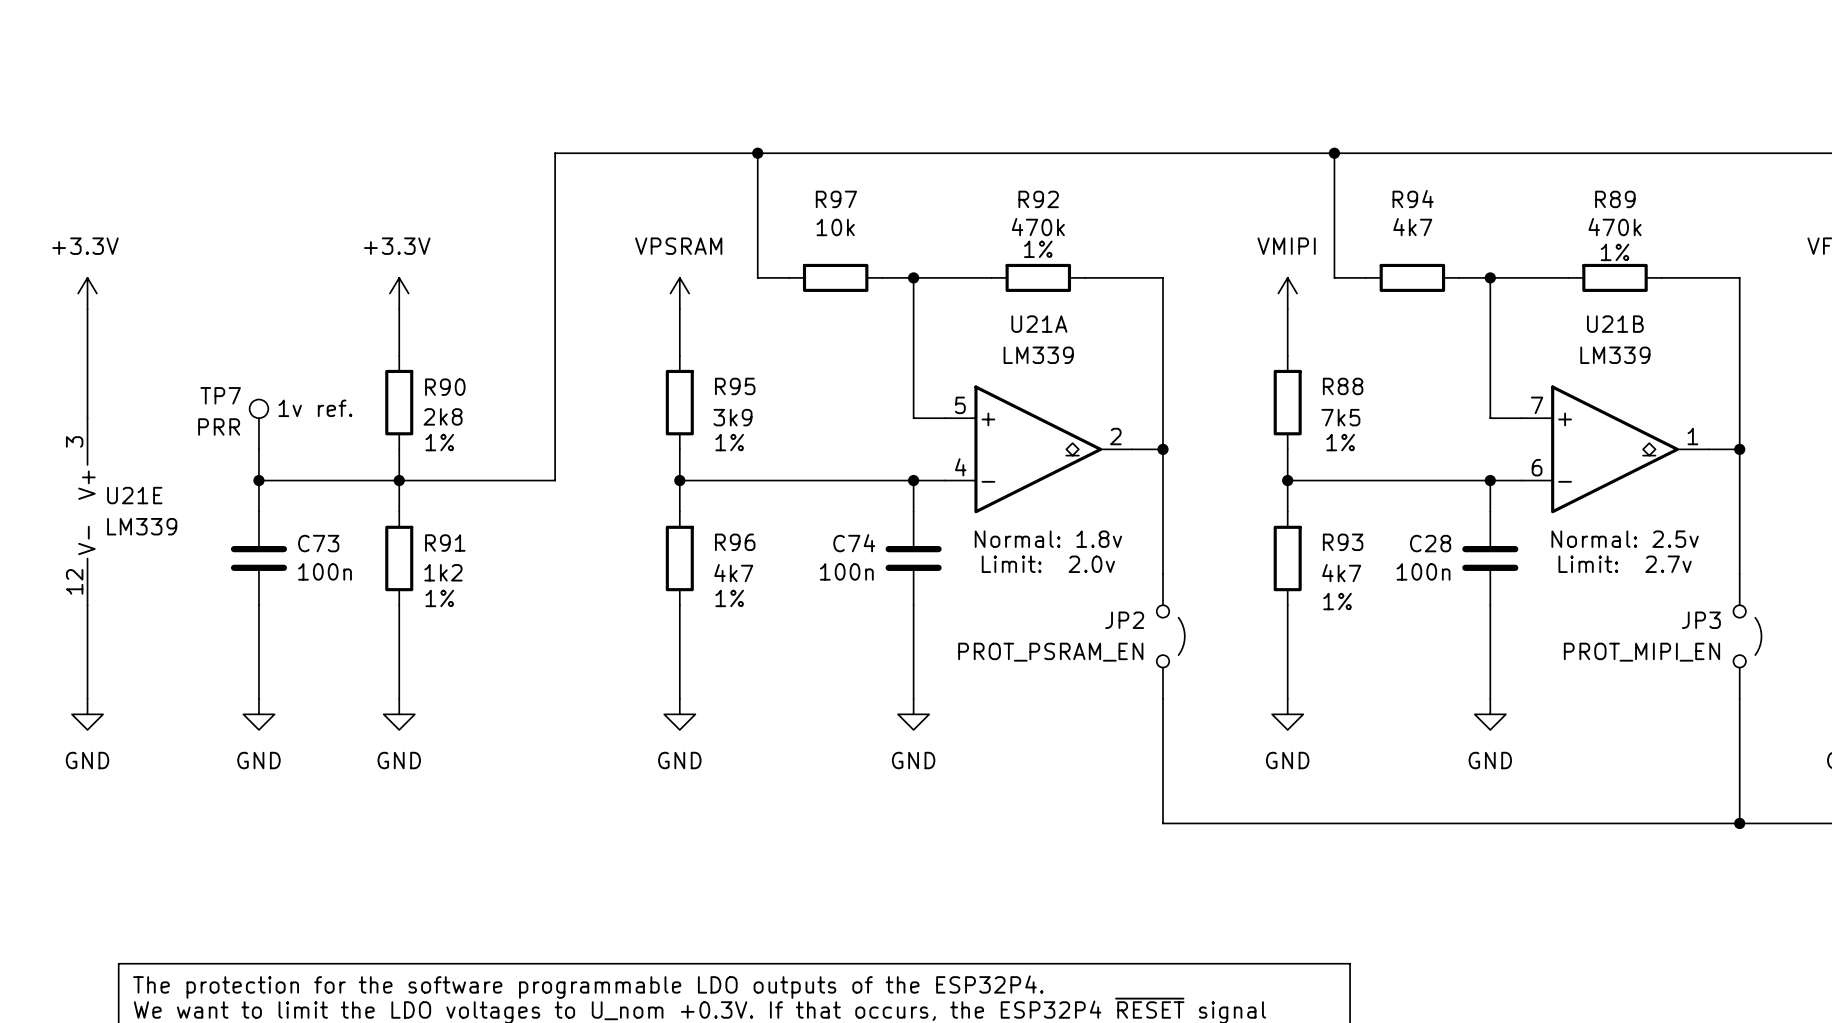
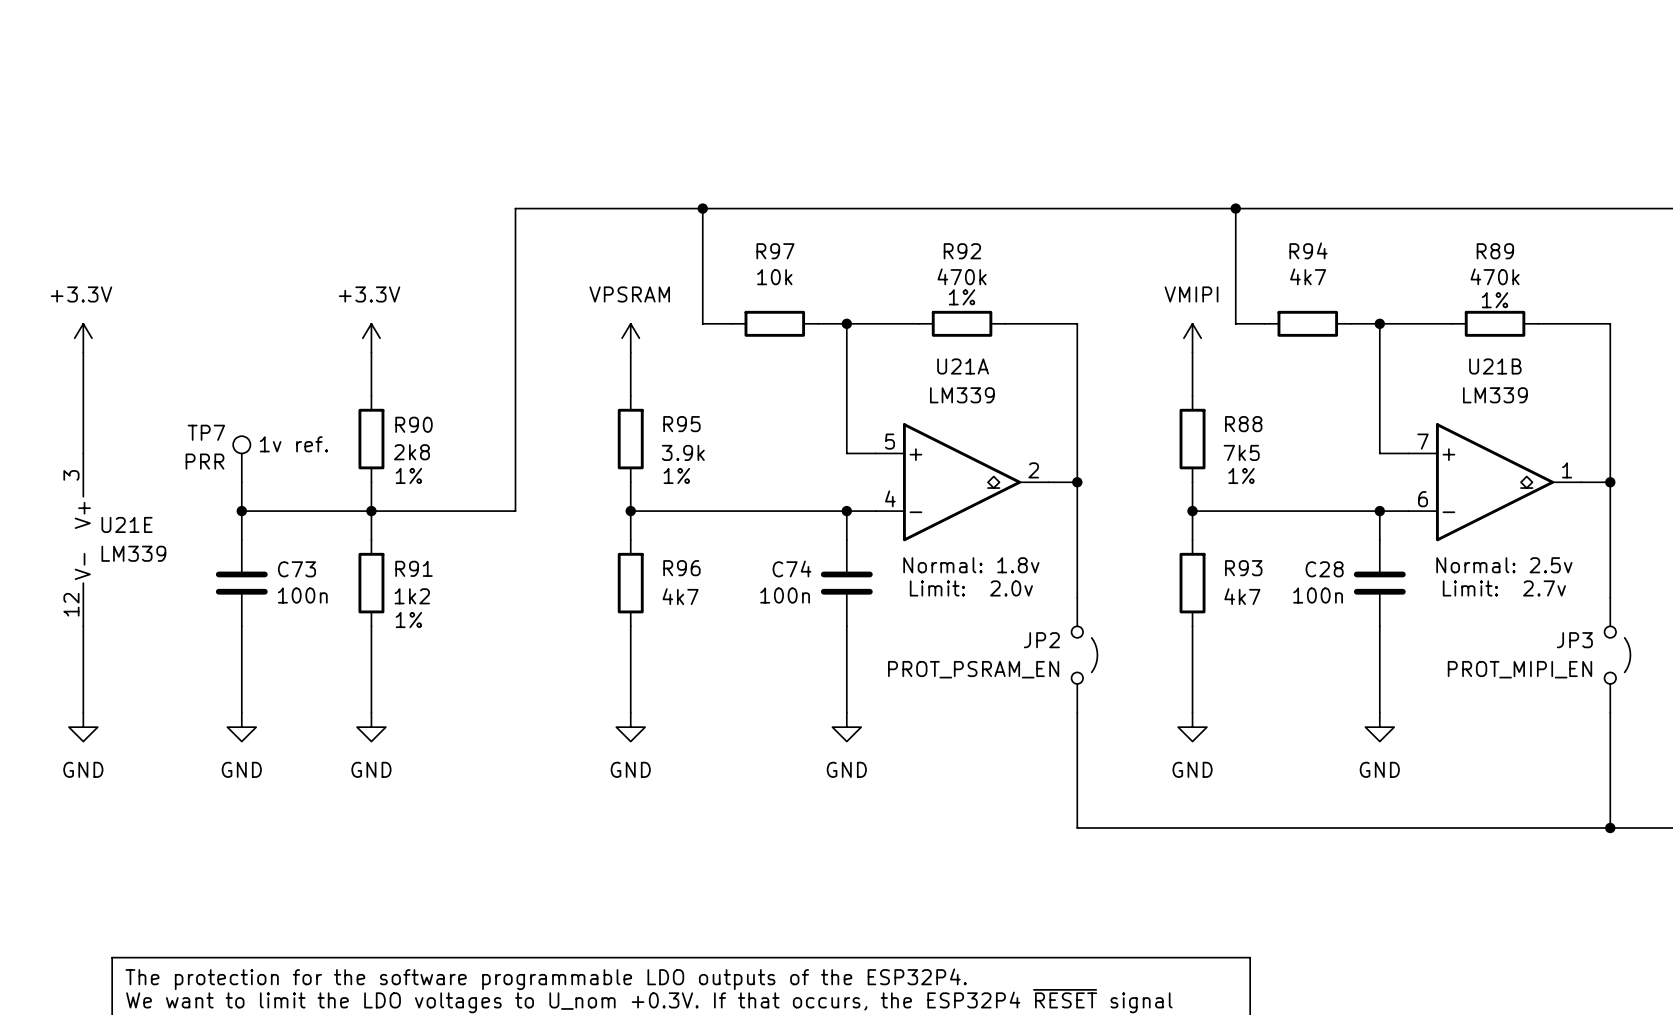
R95 value: 3k9 (732, 417) -> 3.9k (683, 452)
R96 text: 1% (729, 598) -> none
R93 text: 1% (1337, 601) -> none

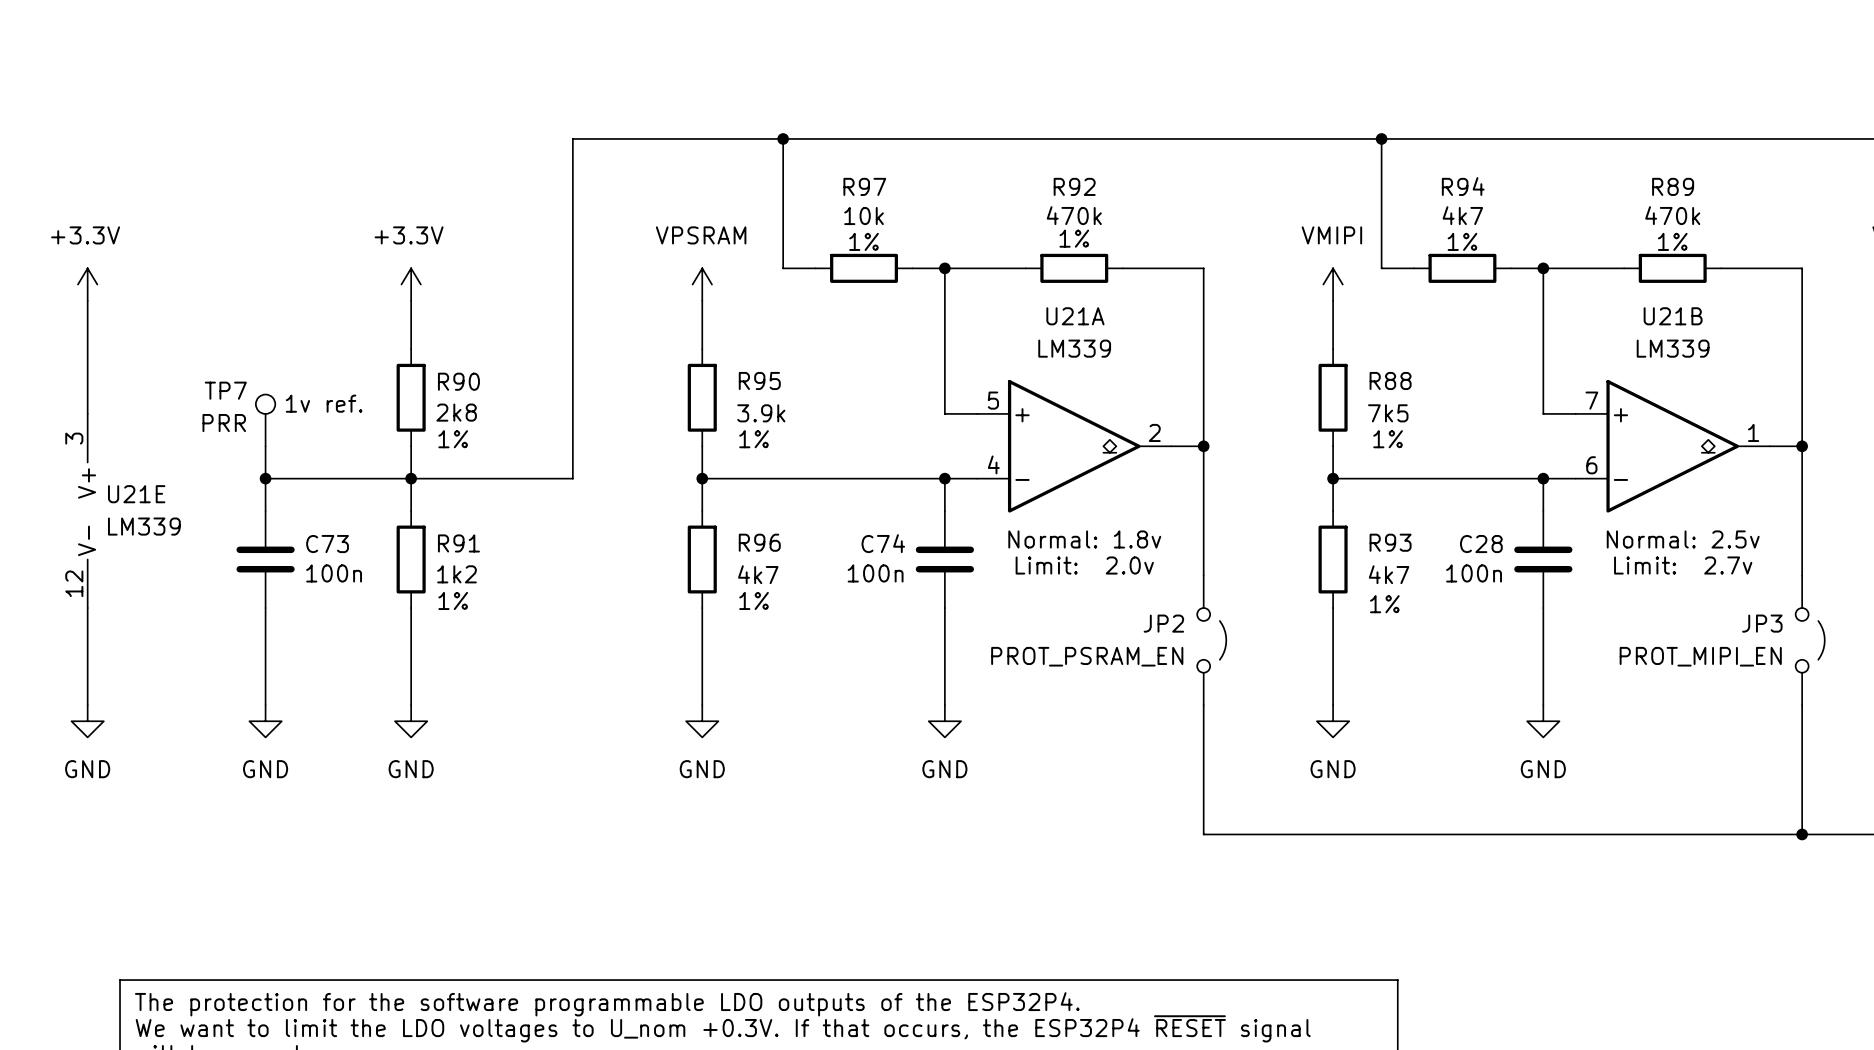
R97 text: none -> 1% (864, 241)
R94 text: none -> 1% (1462, 241)
R96 text: none -> 1% (754, 600)
R93 text: none -> 1% (1384, 604)

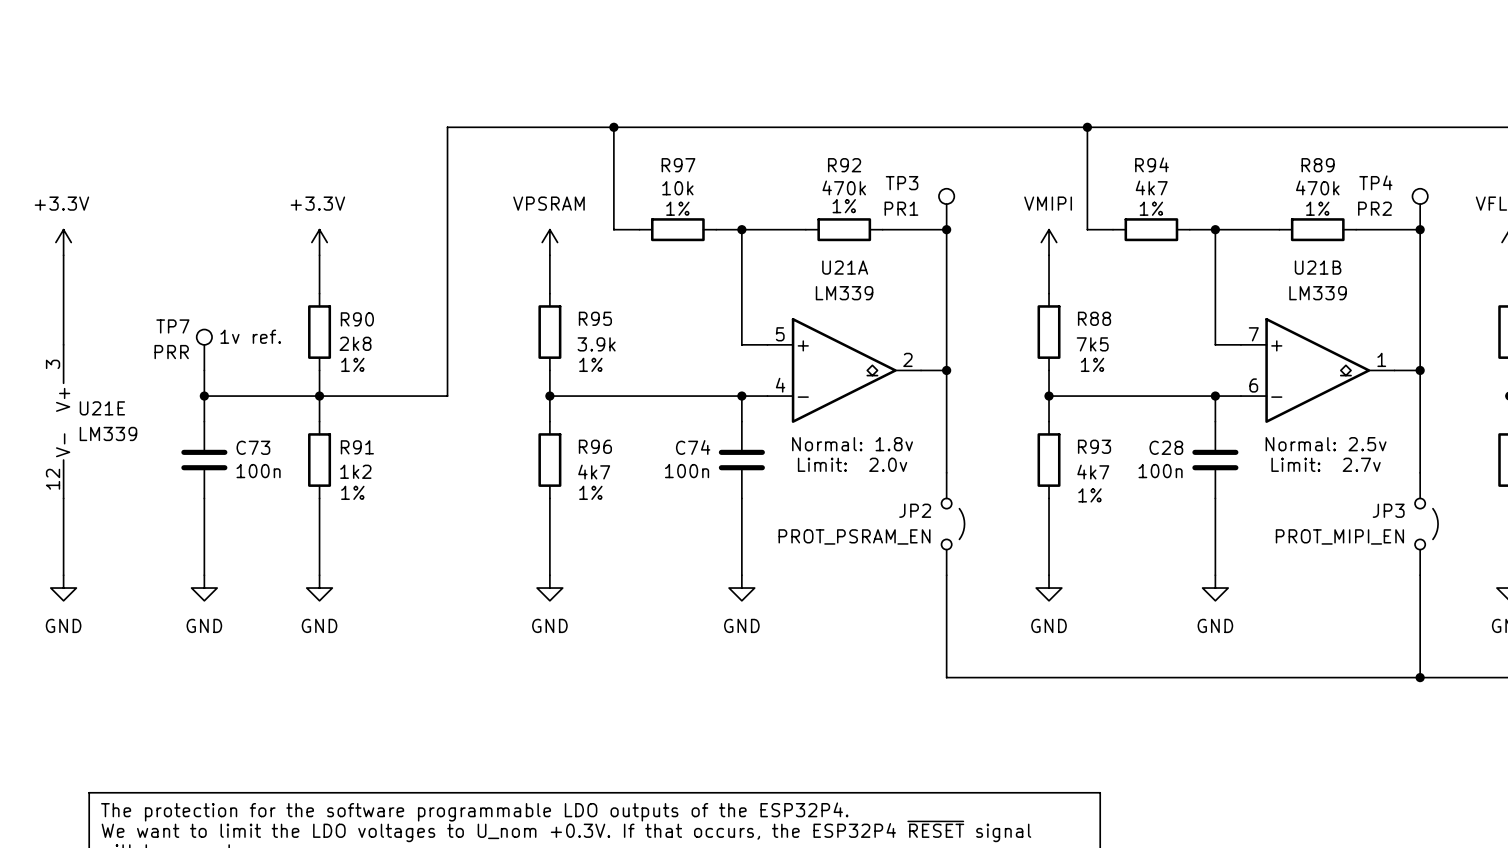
TP3: none -> PR1 (946, 209)
TP4: none -> PR2 (1420, 209)
junction: none -> (946, 229)
junction: none -> (1420, 229)

